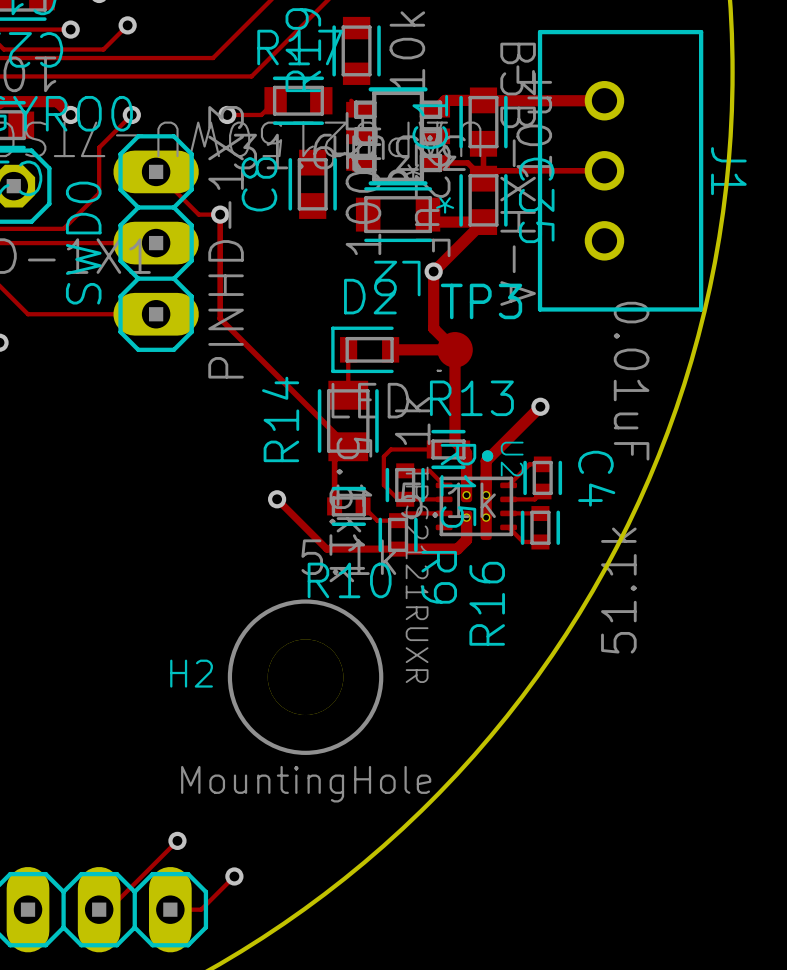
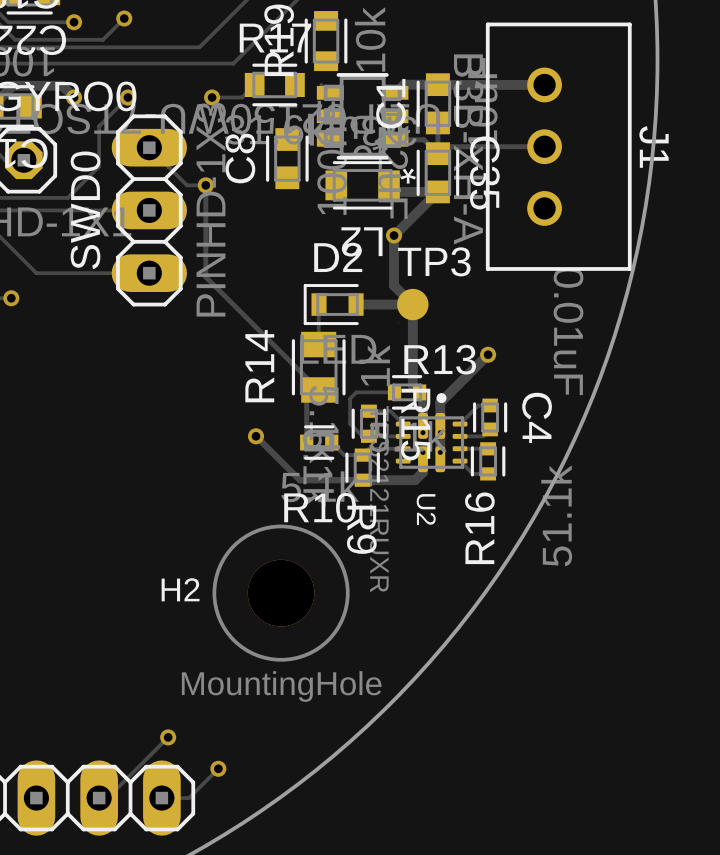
R13 name position: R13 (471, 398) -> R13 (440, 359)
U2 name position: U2 (512, 459) -> U2 (426, 509)
R9 name position: R9 (439, 577) -> R9 (361, 529)
R16 name position: R16 (487, 603) -> R16 (479, 528)

